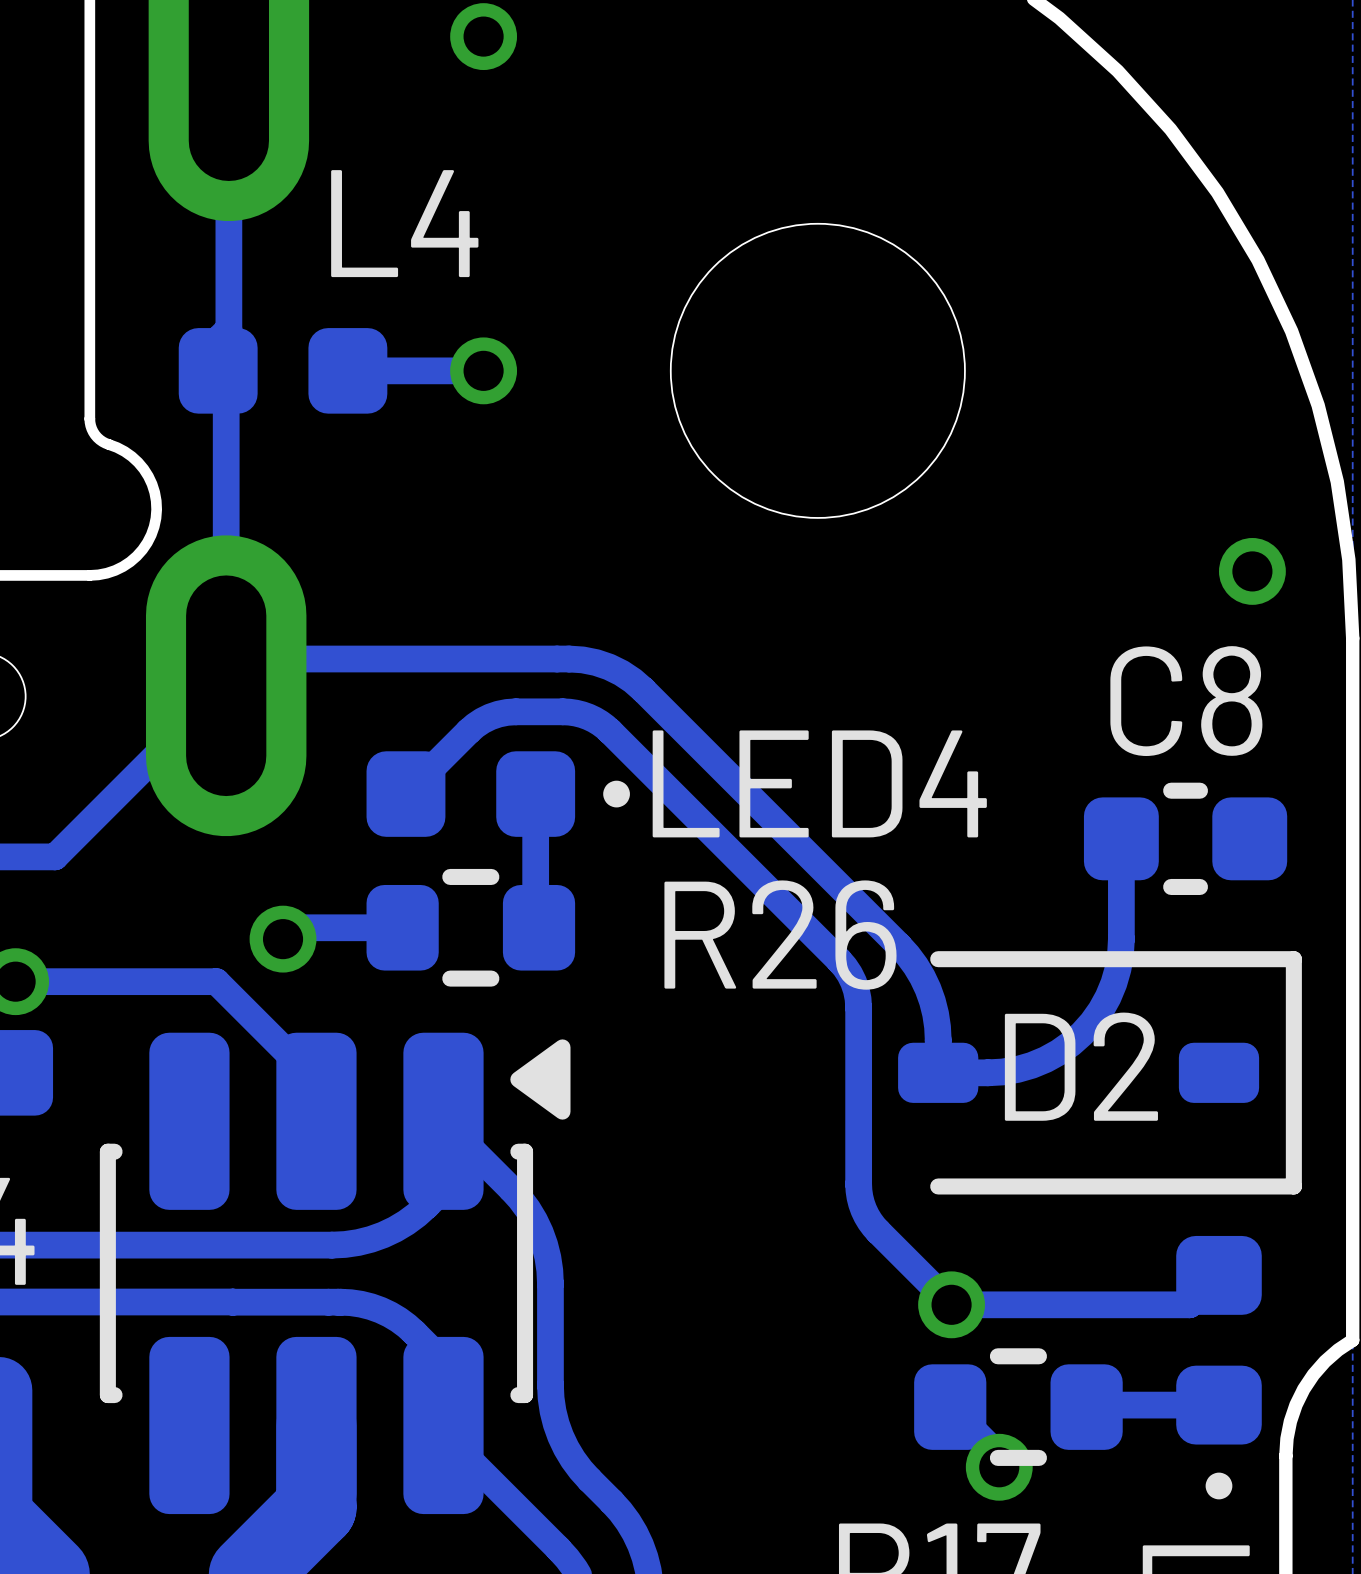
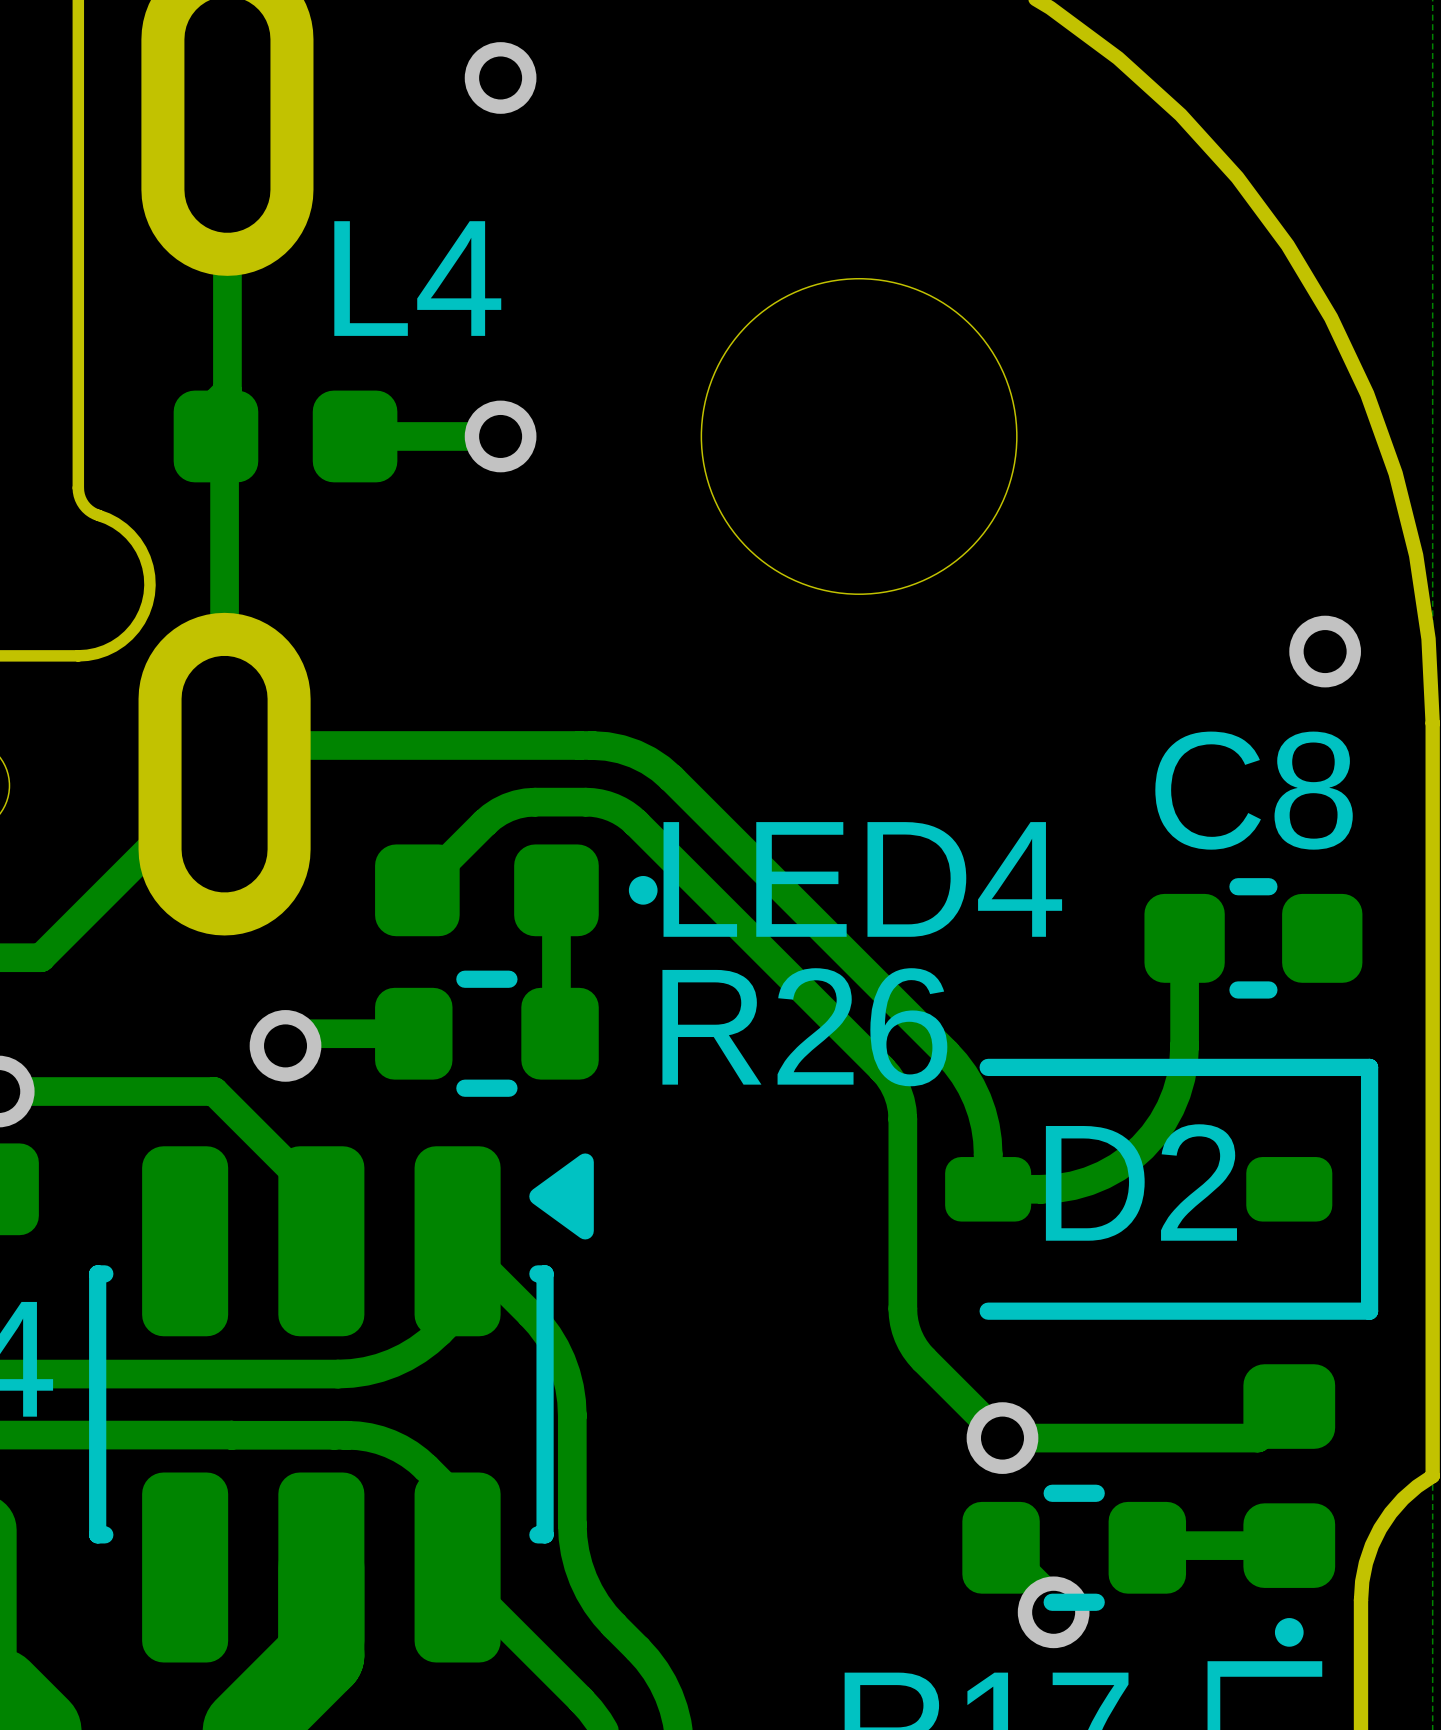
R26 name position: R26 (780, 935) -> R26 (804, 1027)

